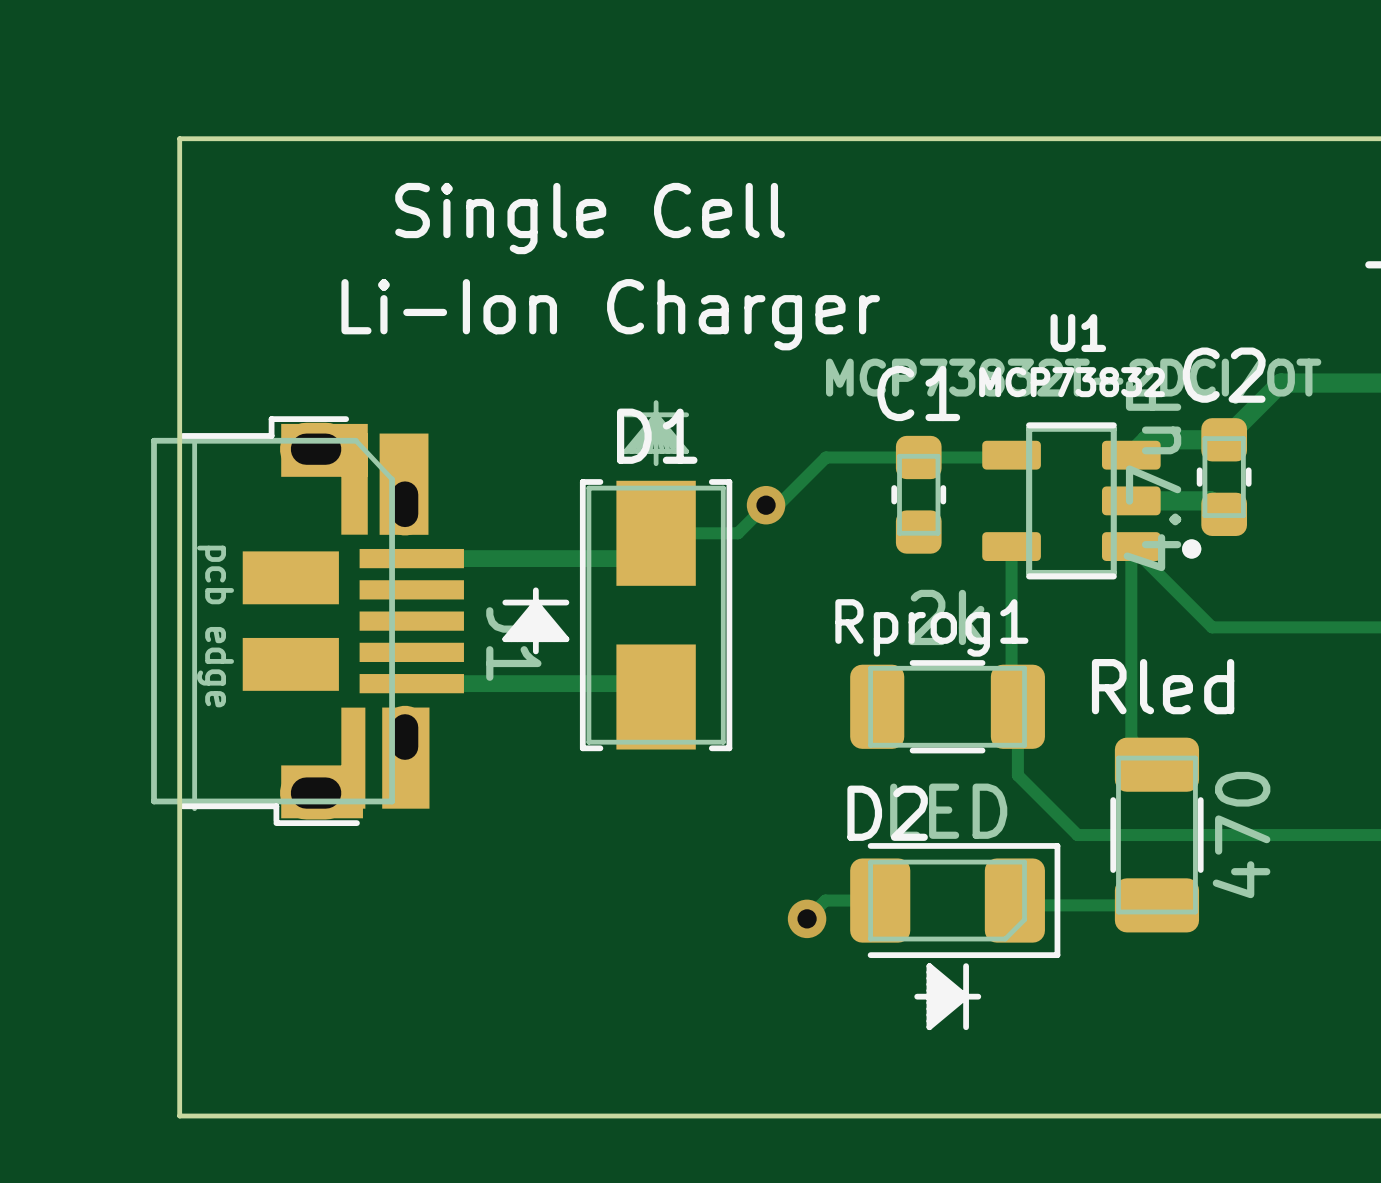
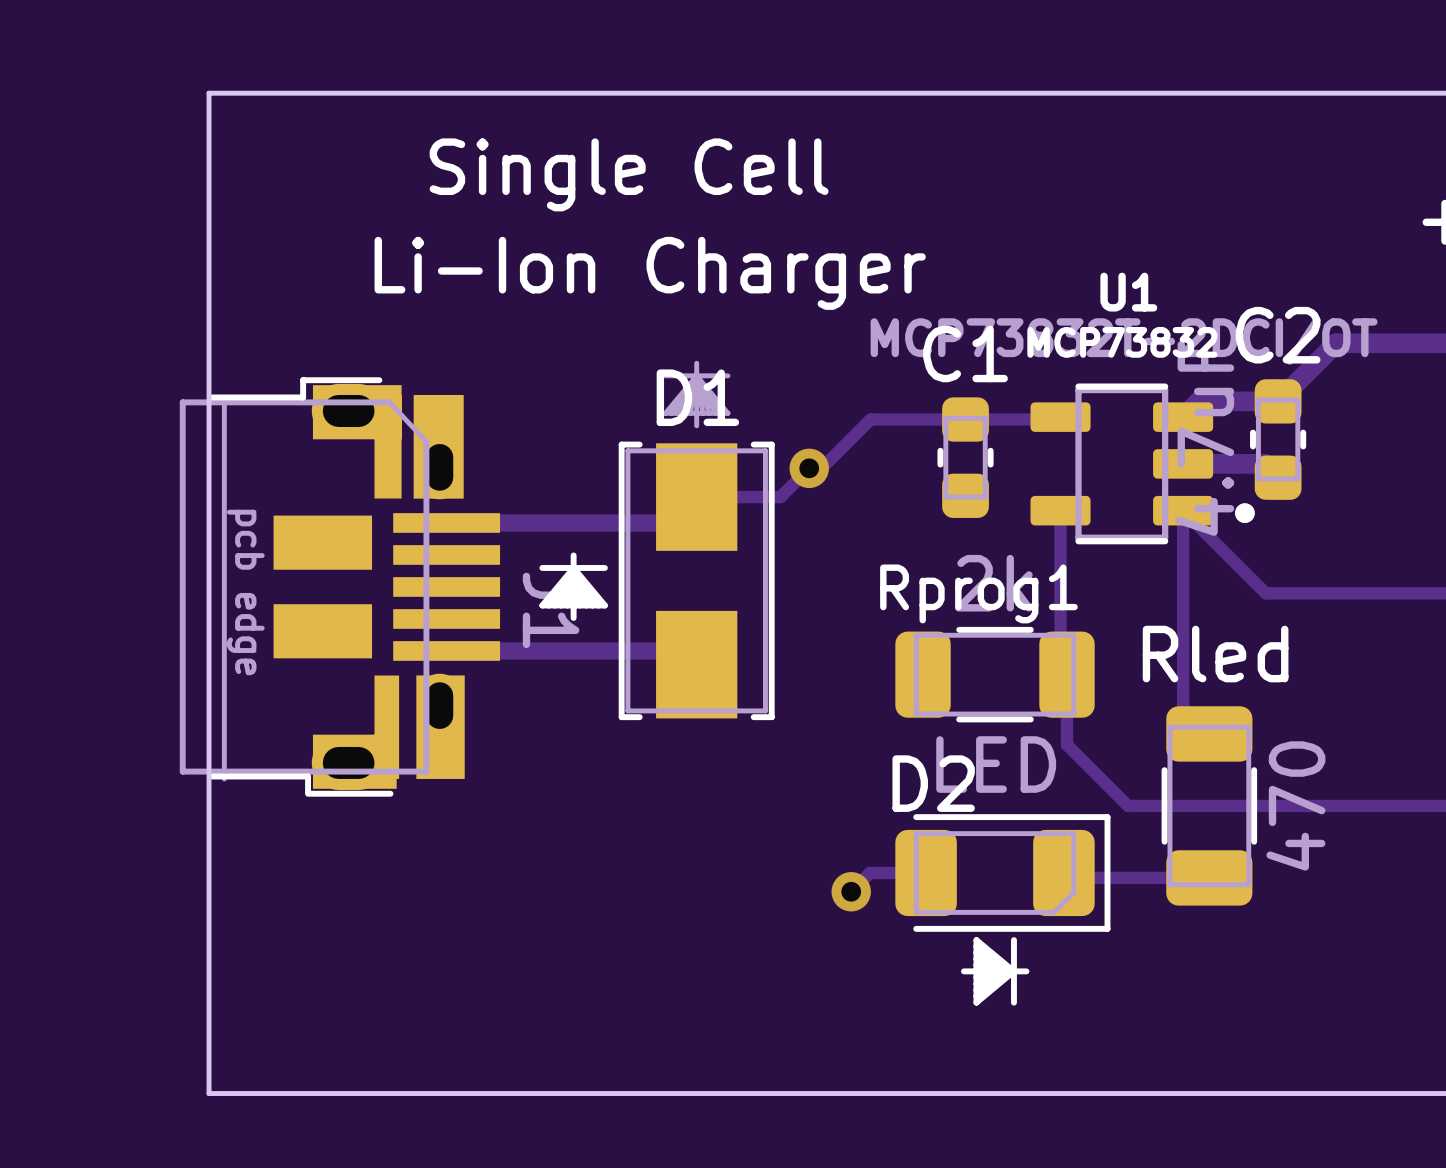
D2 value position: LED (948, 811) -> LED (996, 764)

